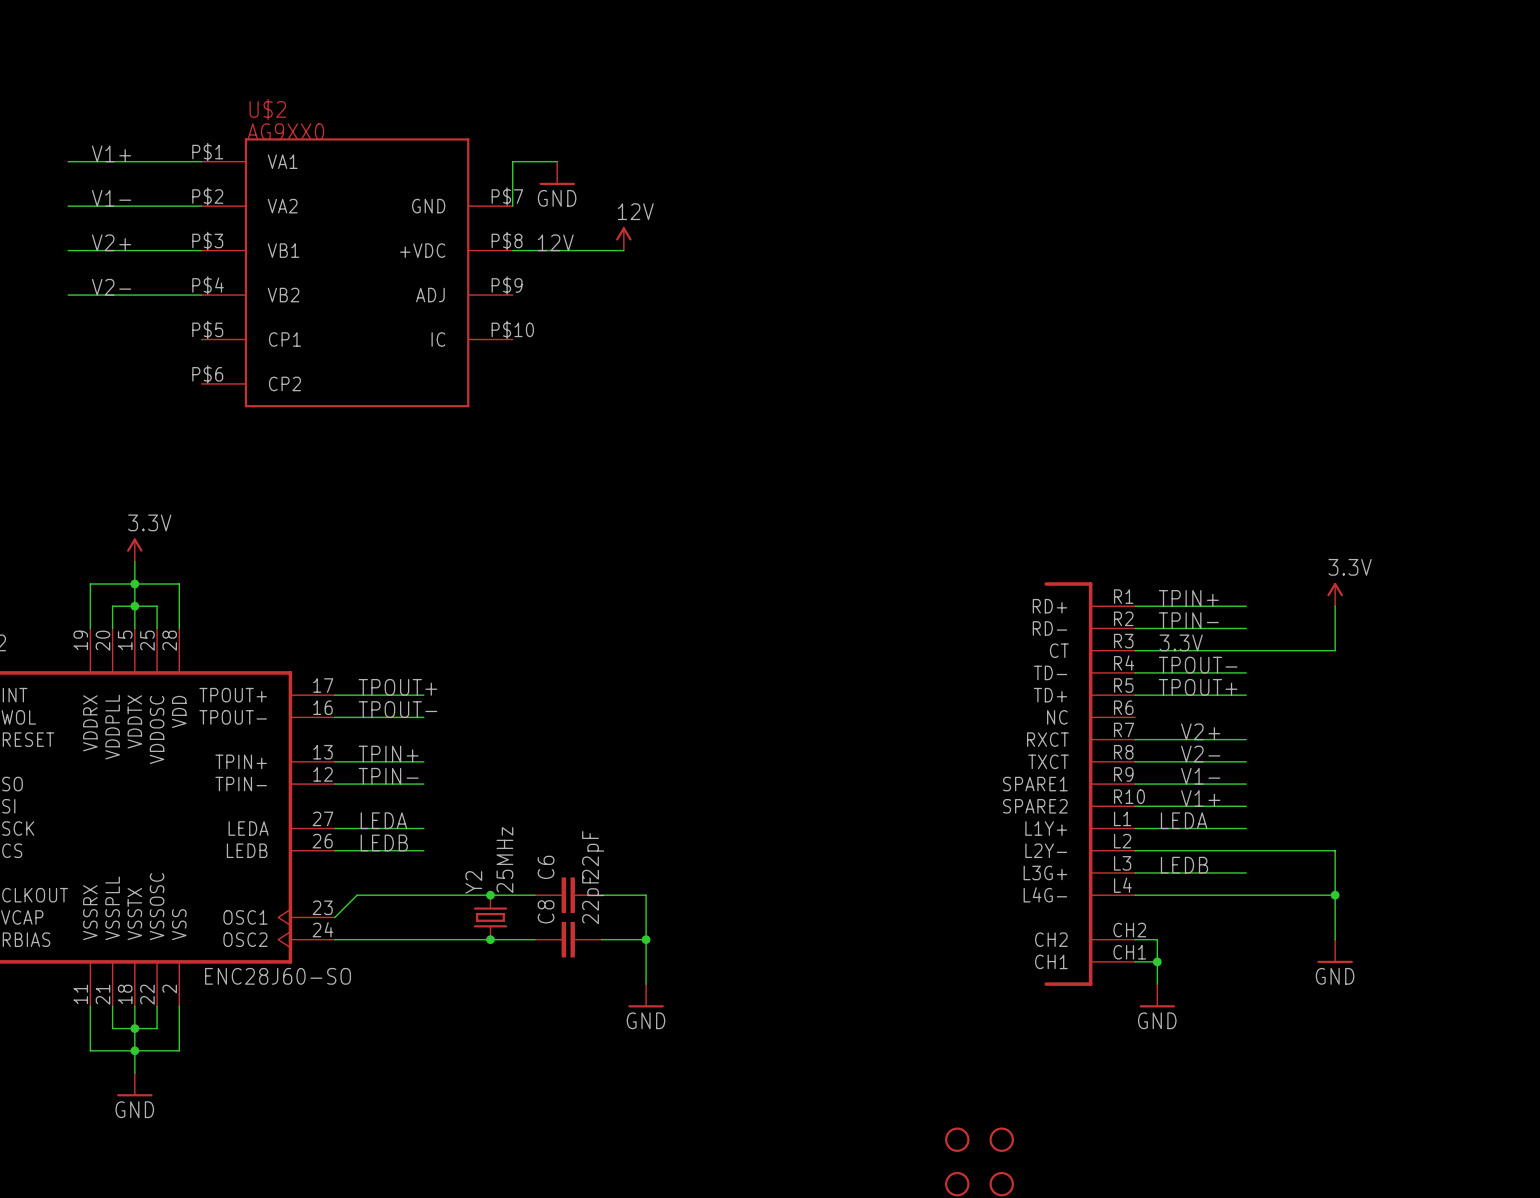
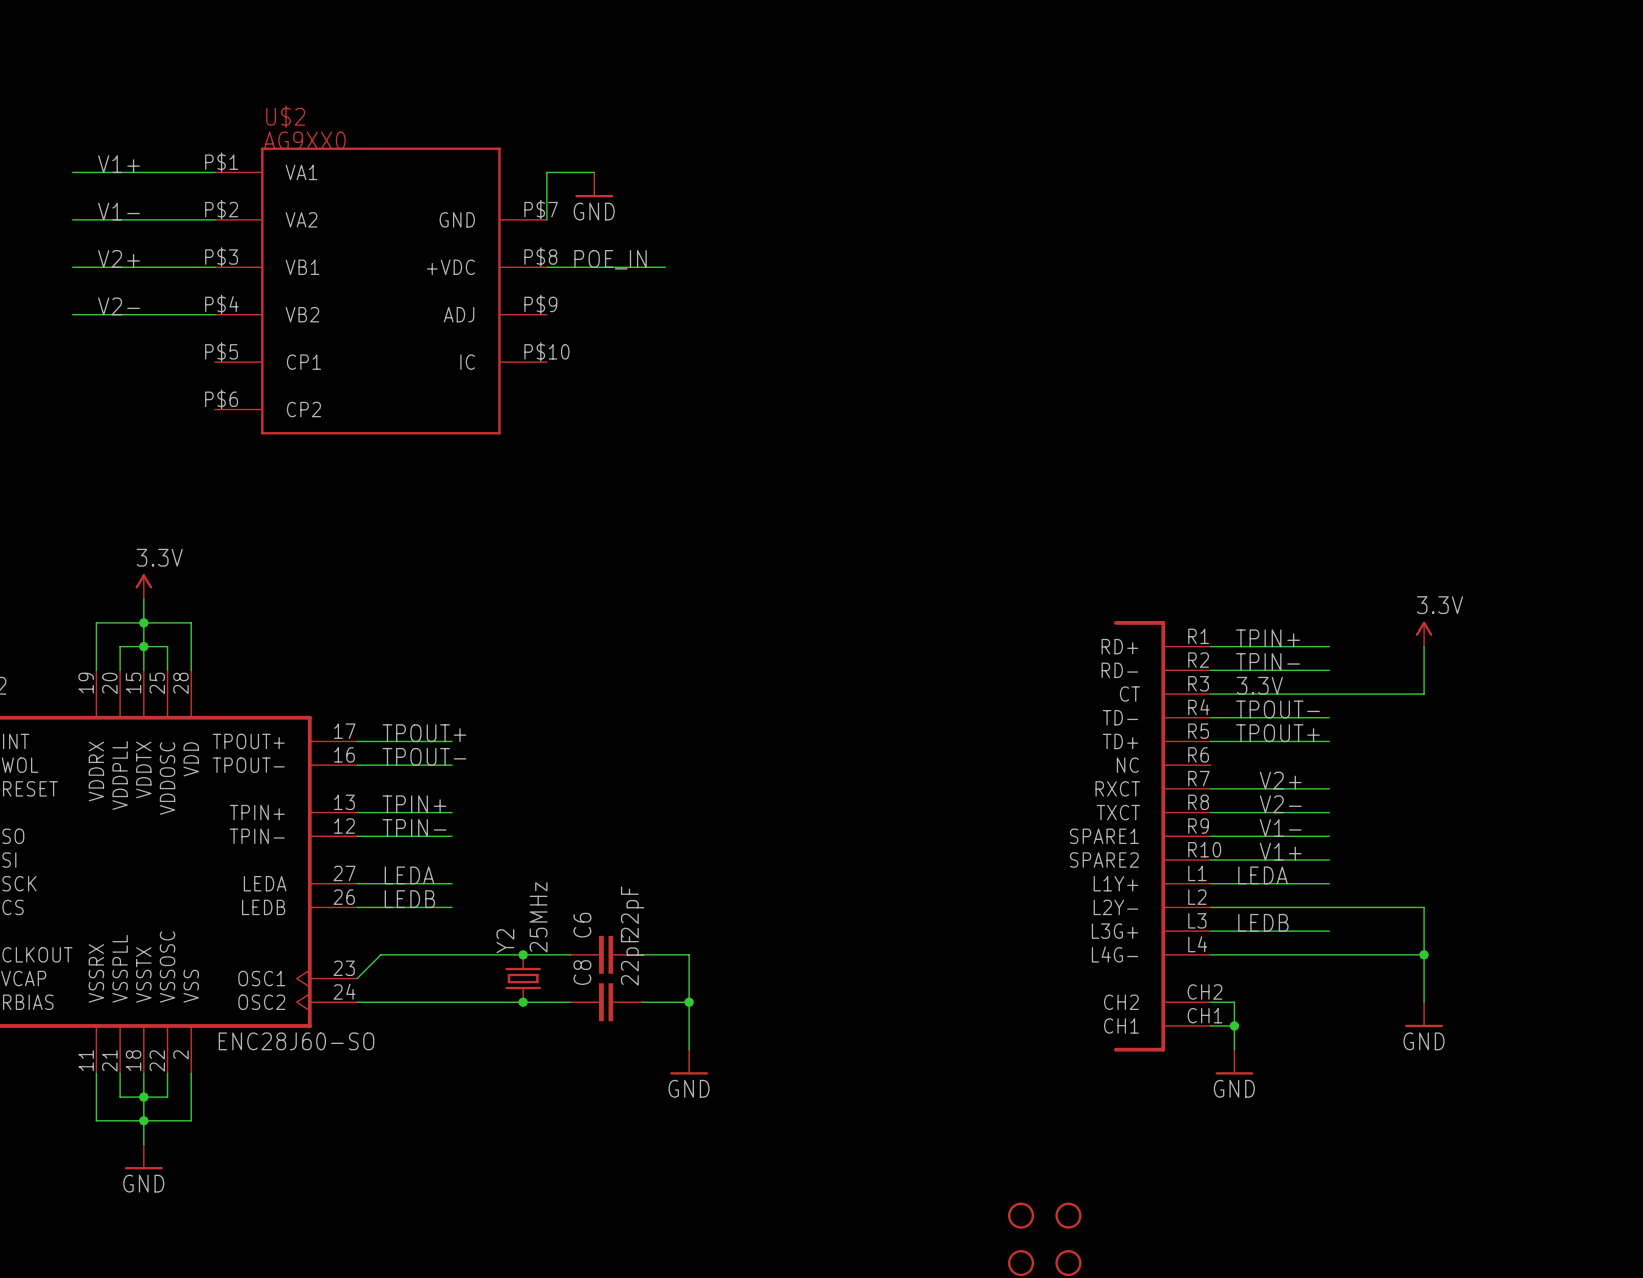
power symbol: 12V (623, 238) -> none
label: 12V (555, 242) -> POE_IN (610, 259)

